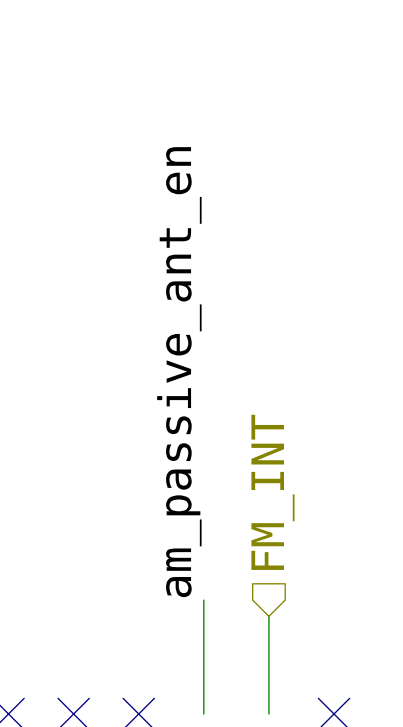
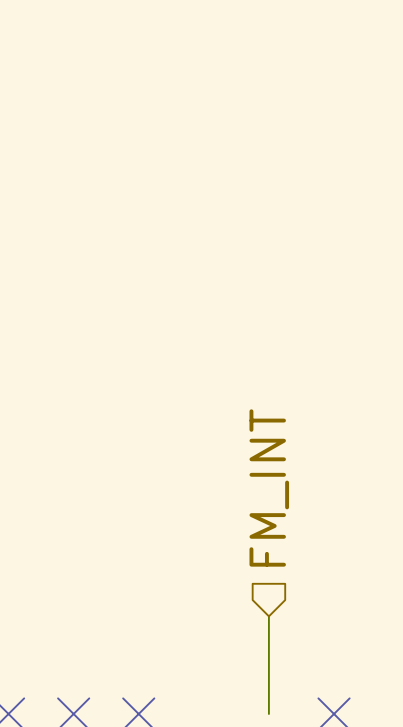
label: am_passive_ant_en (179, 372) -> none
wire: (203, 600) (203, 713) -> none

